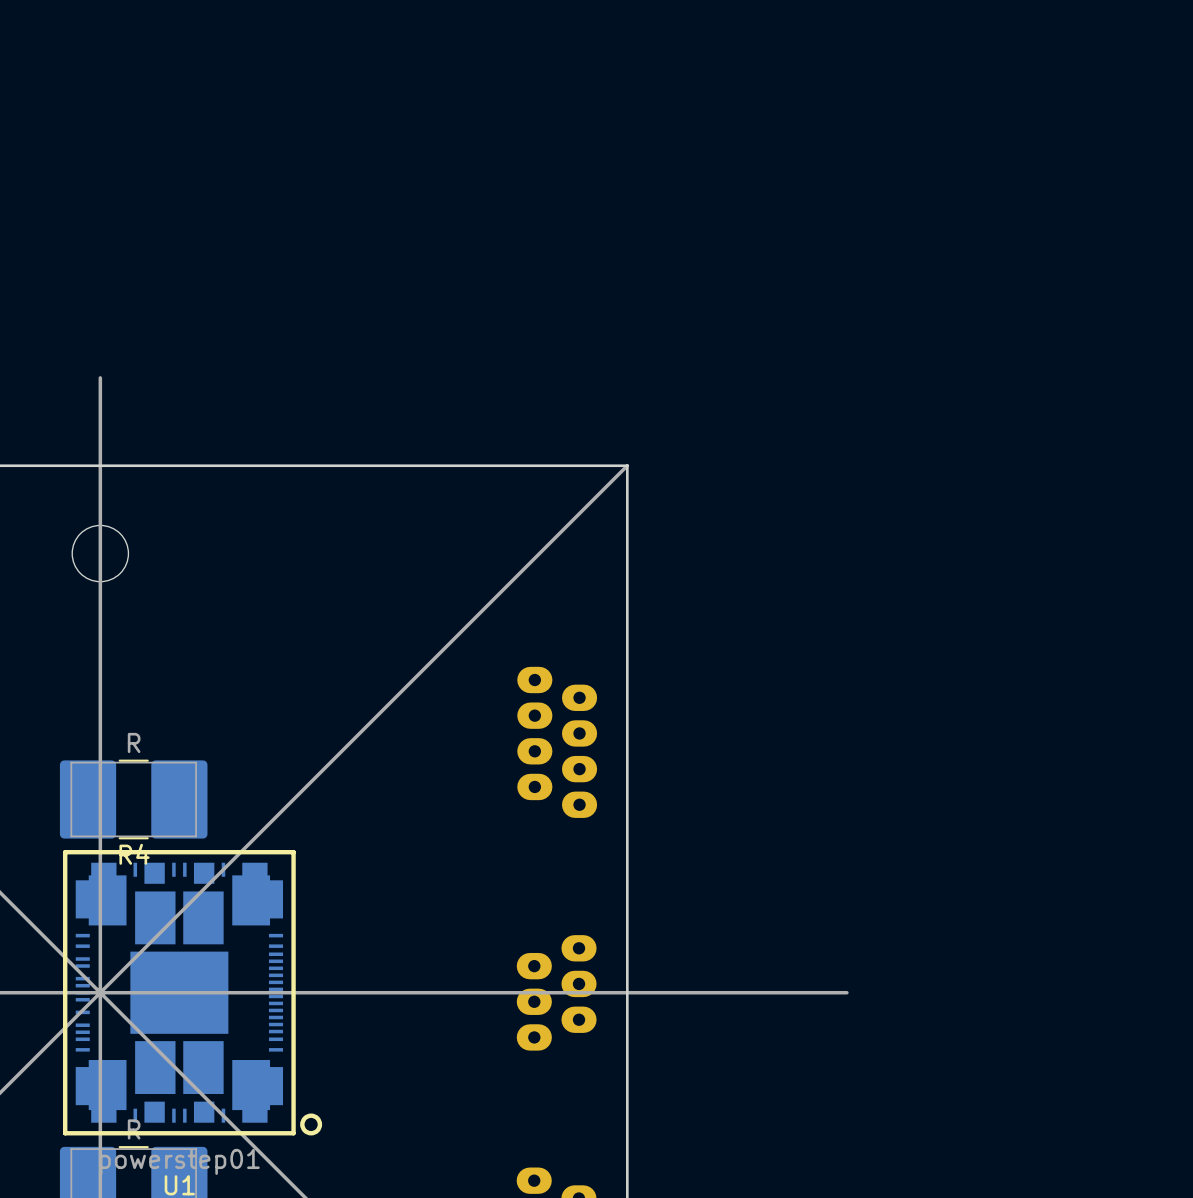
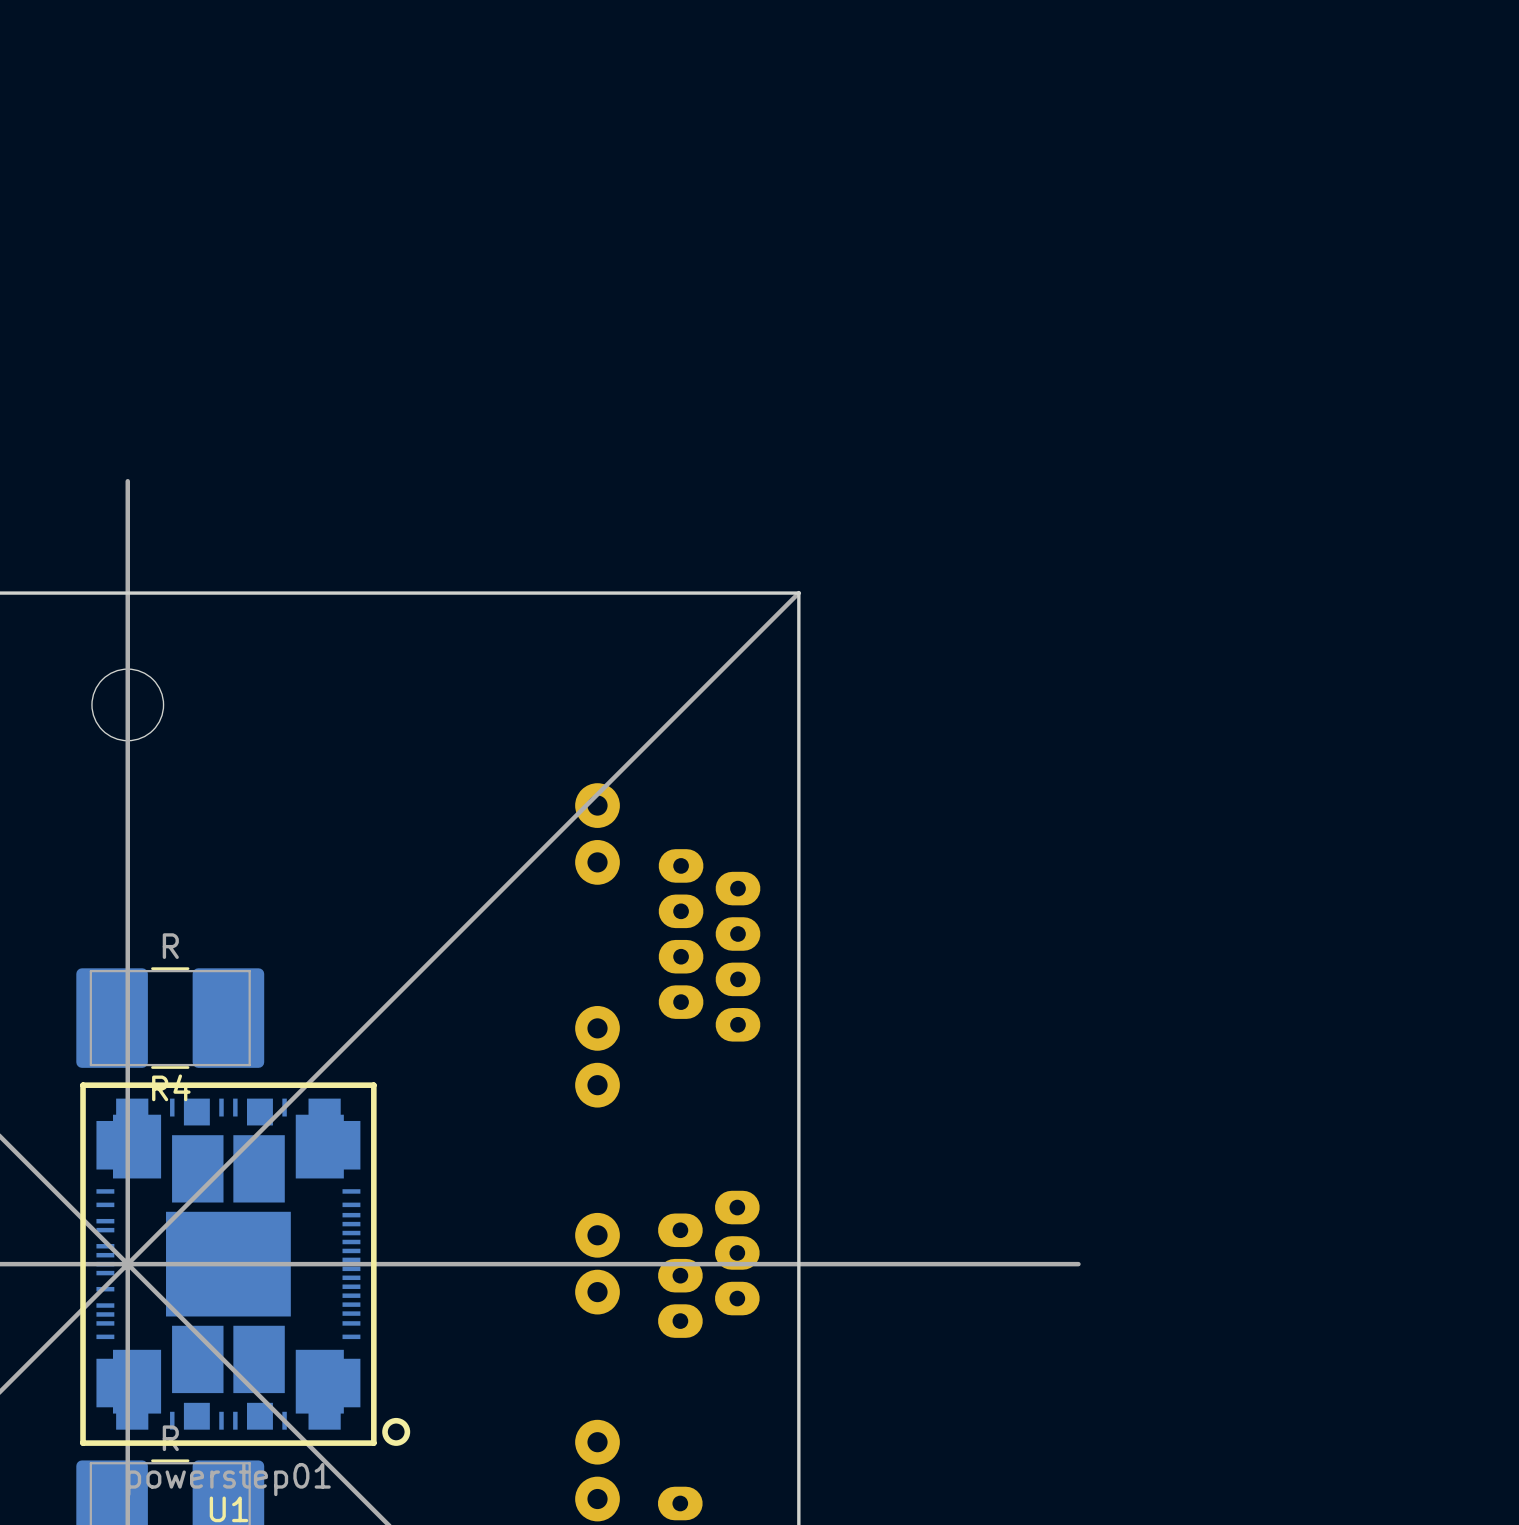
part: none -> (597, 833)
part: none -> (597, 1056)
part: none -> (597, 1263)
part: none -> (597, 1470)

